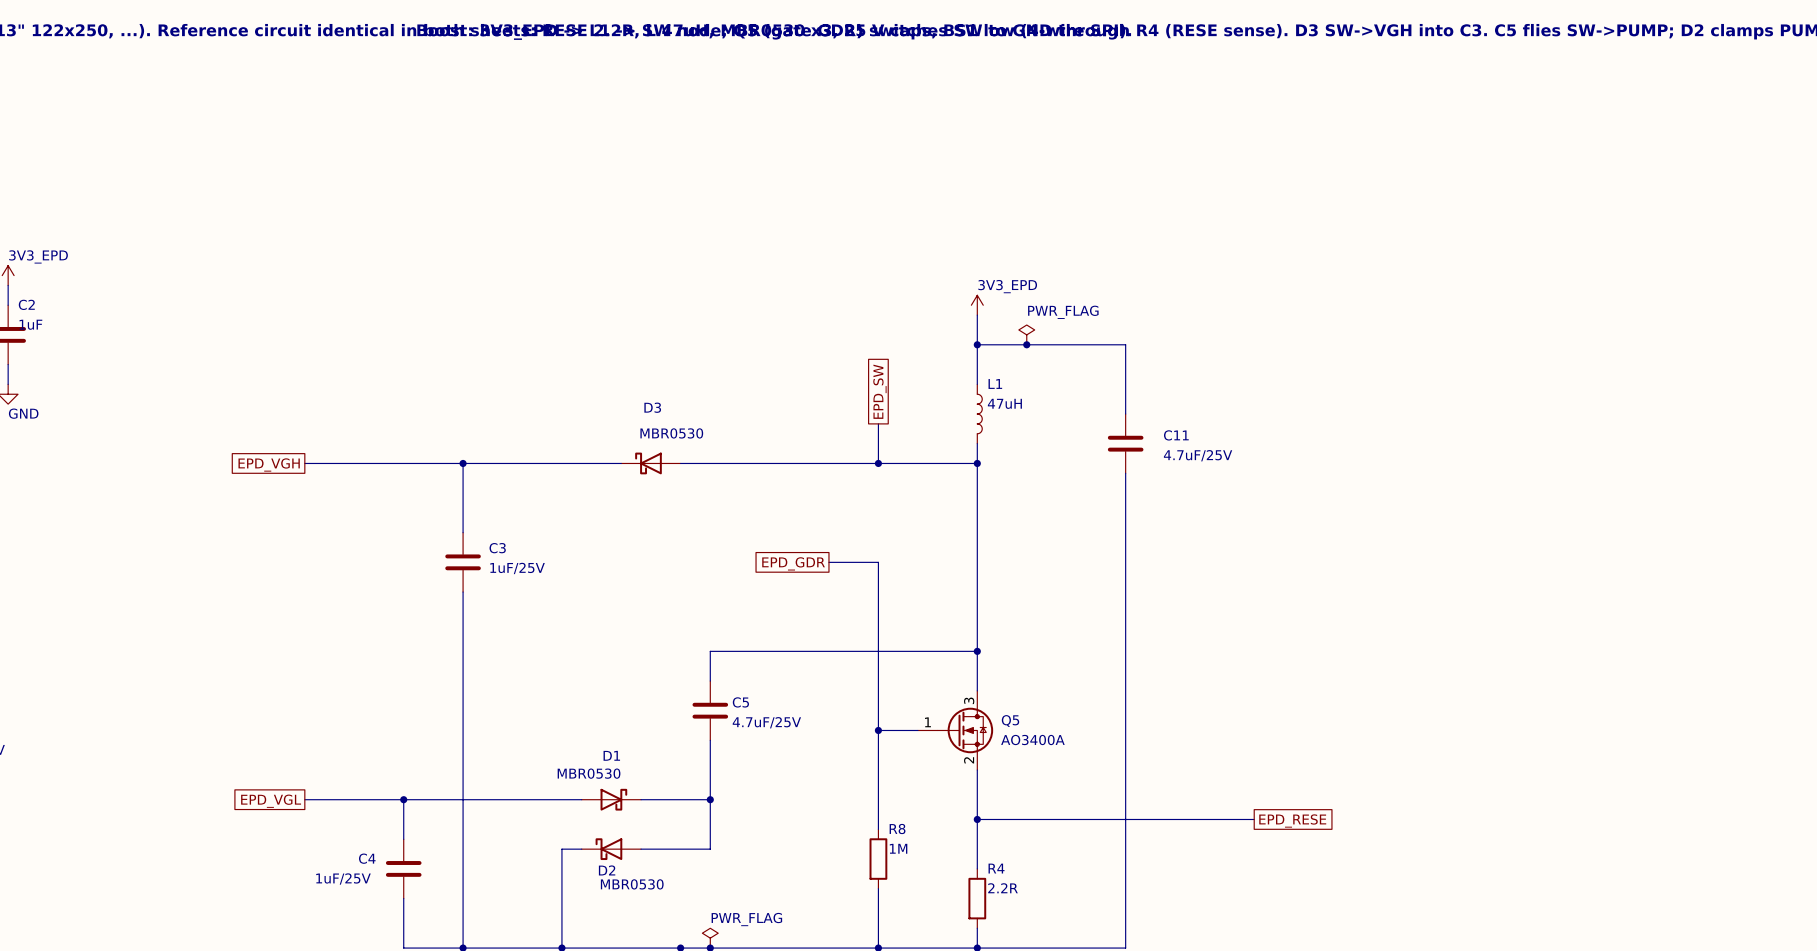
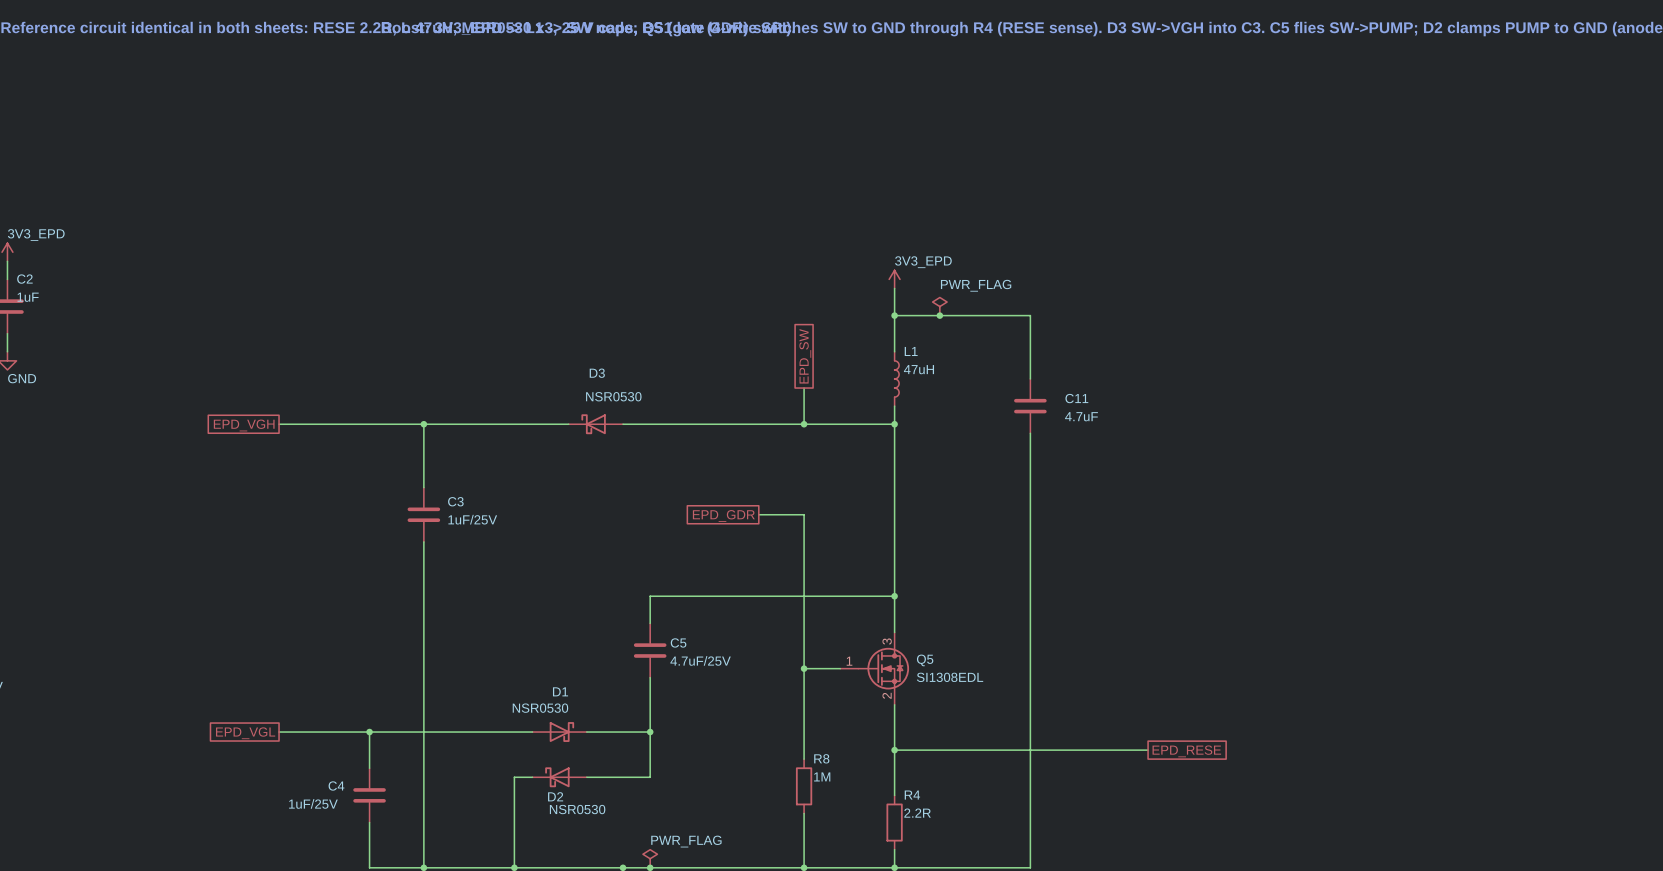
D3 value: MBR0530 (671, 433) -> NSR0530 (613, 396)
C11 value: 4.7uF/25V (1198, 455) -> 4.7uF (1081, 416)
Q5 value: AO3400A (1032, 740) -> SI1308EDL (950, 677)
D1 value: MBR0530 (589, 773) -> NSR0530 (540, 708)
D2 value: MBR0530 (632, 884) -> NSR0530 (577, 809)

